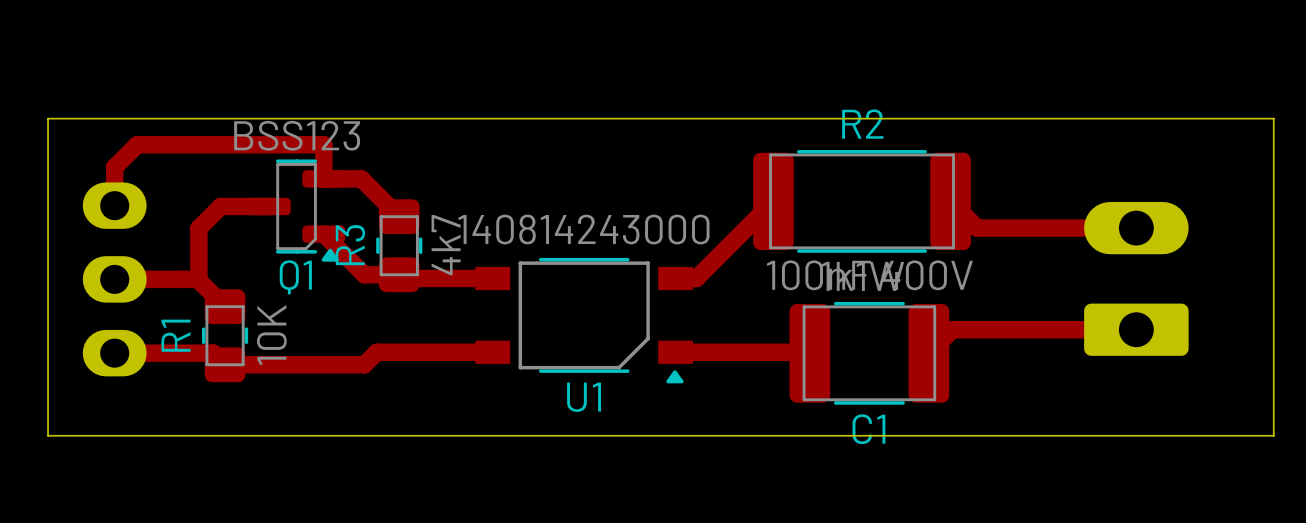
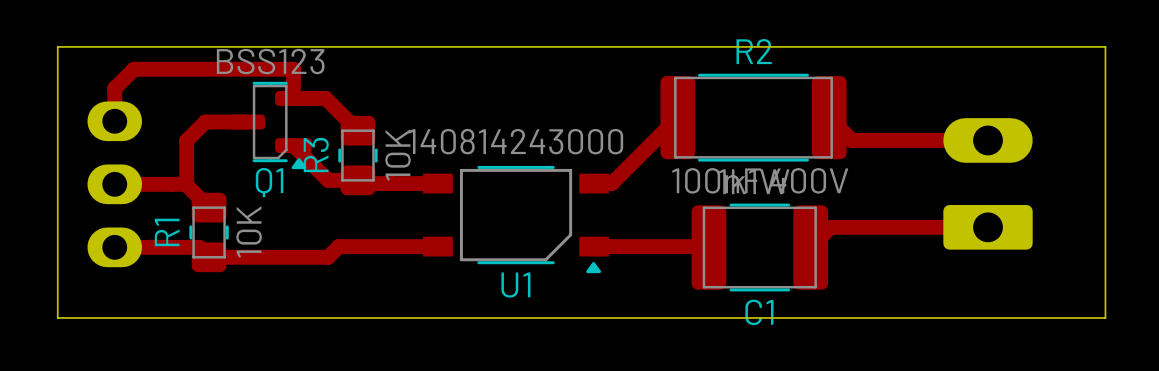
R3 value: 4k7 (446, 245) -> 10K (398, 154)

